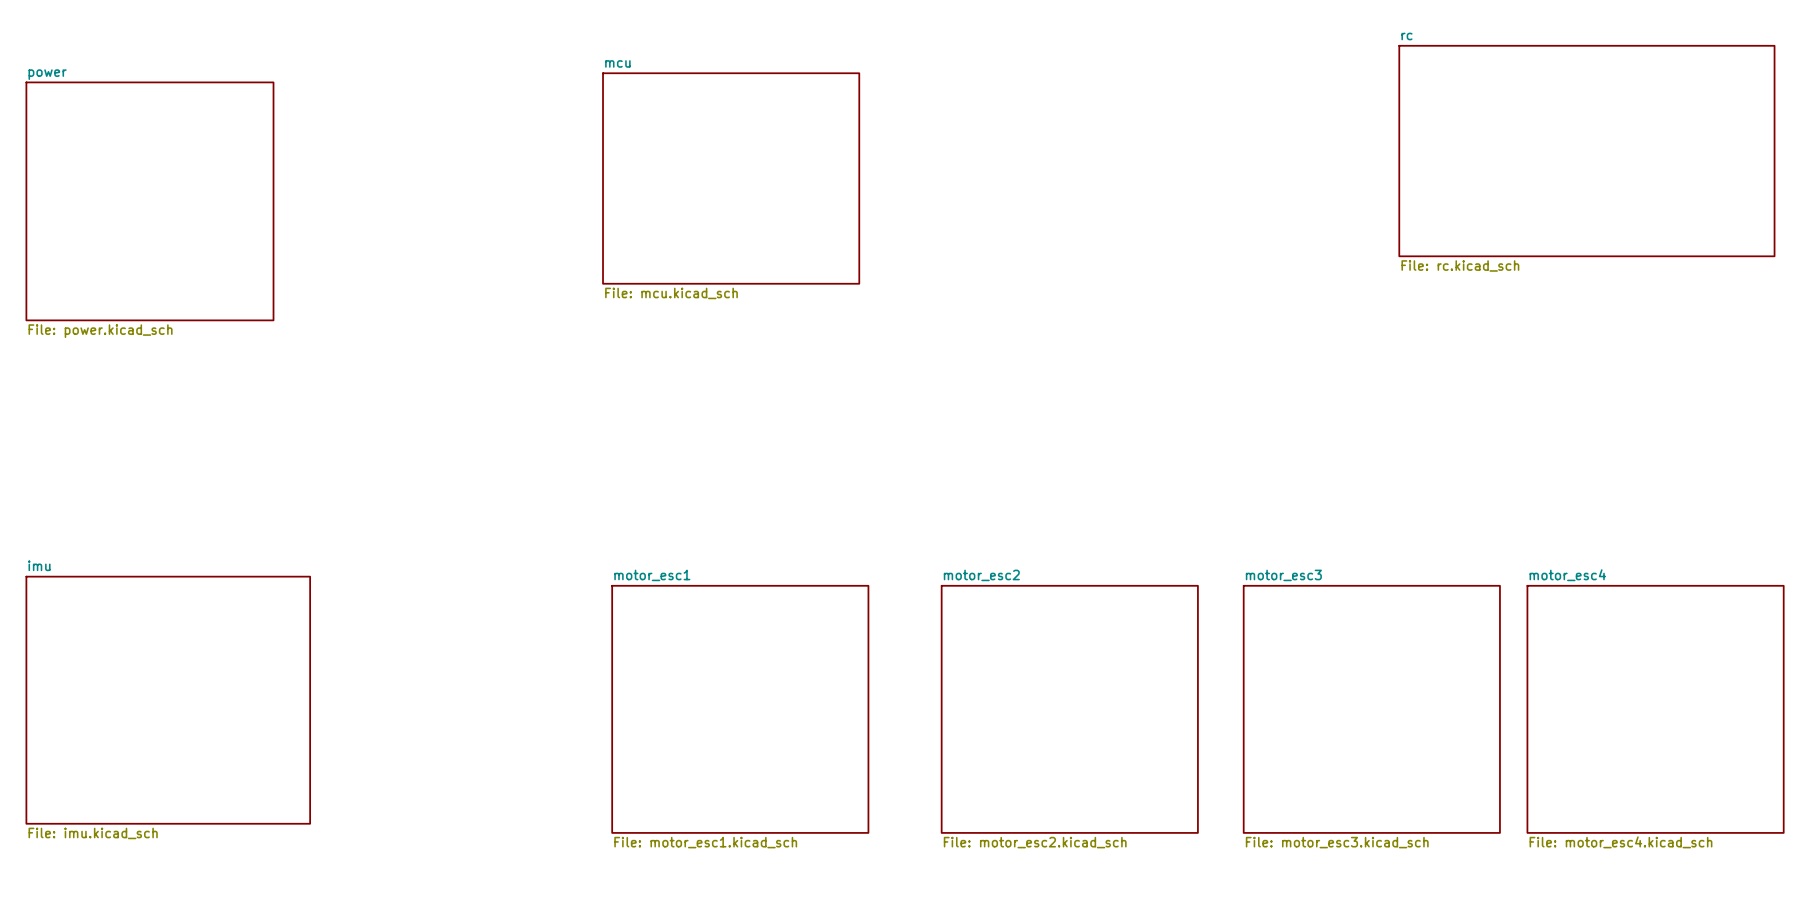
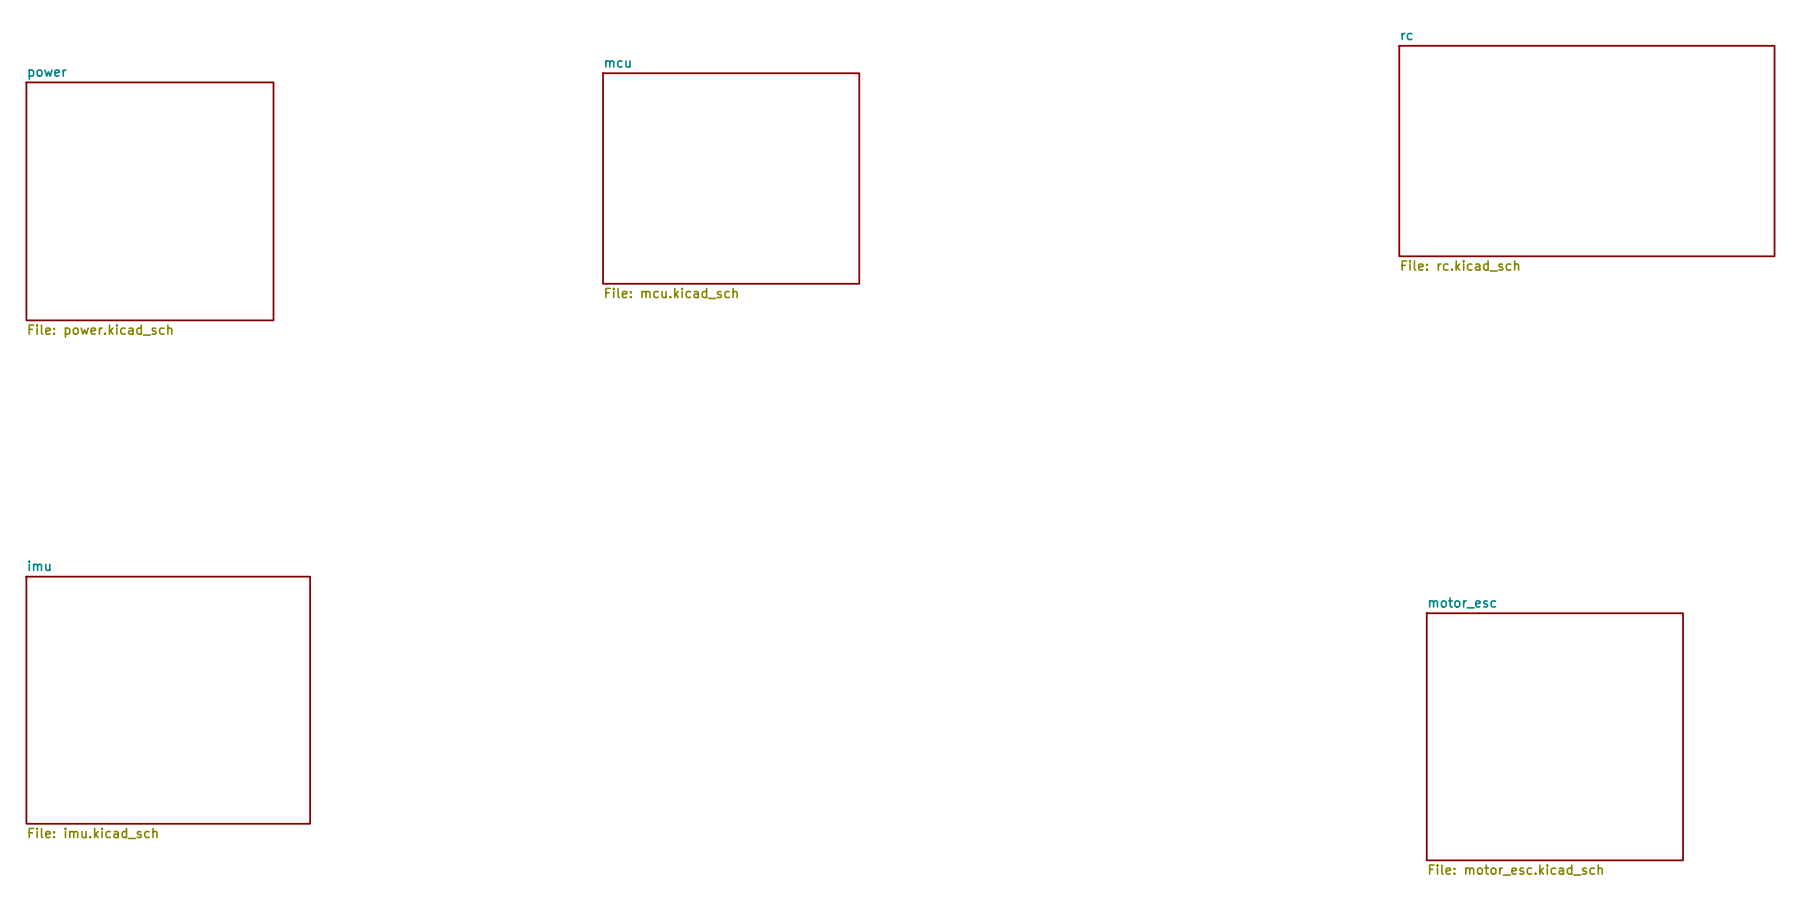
sheet motor_esc1: File: motor_esc1.kicad_sch (740, 709) -> none
sheet motor_esc2: File: motor_esc2.kicad_sch (1069, 709) -> none
sheet motor_esc3: File: motor_esc3.kicad_sch (1371, 709) -> none
sheet motor_esc4: File: motor_esc4.kicad_sch (1655, 709) -> none
sheet motor_esc: none -> File: motor_esc.kicad_sch (1554, 736)

